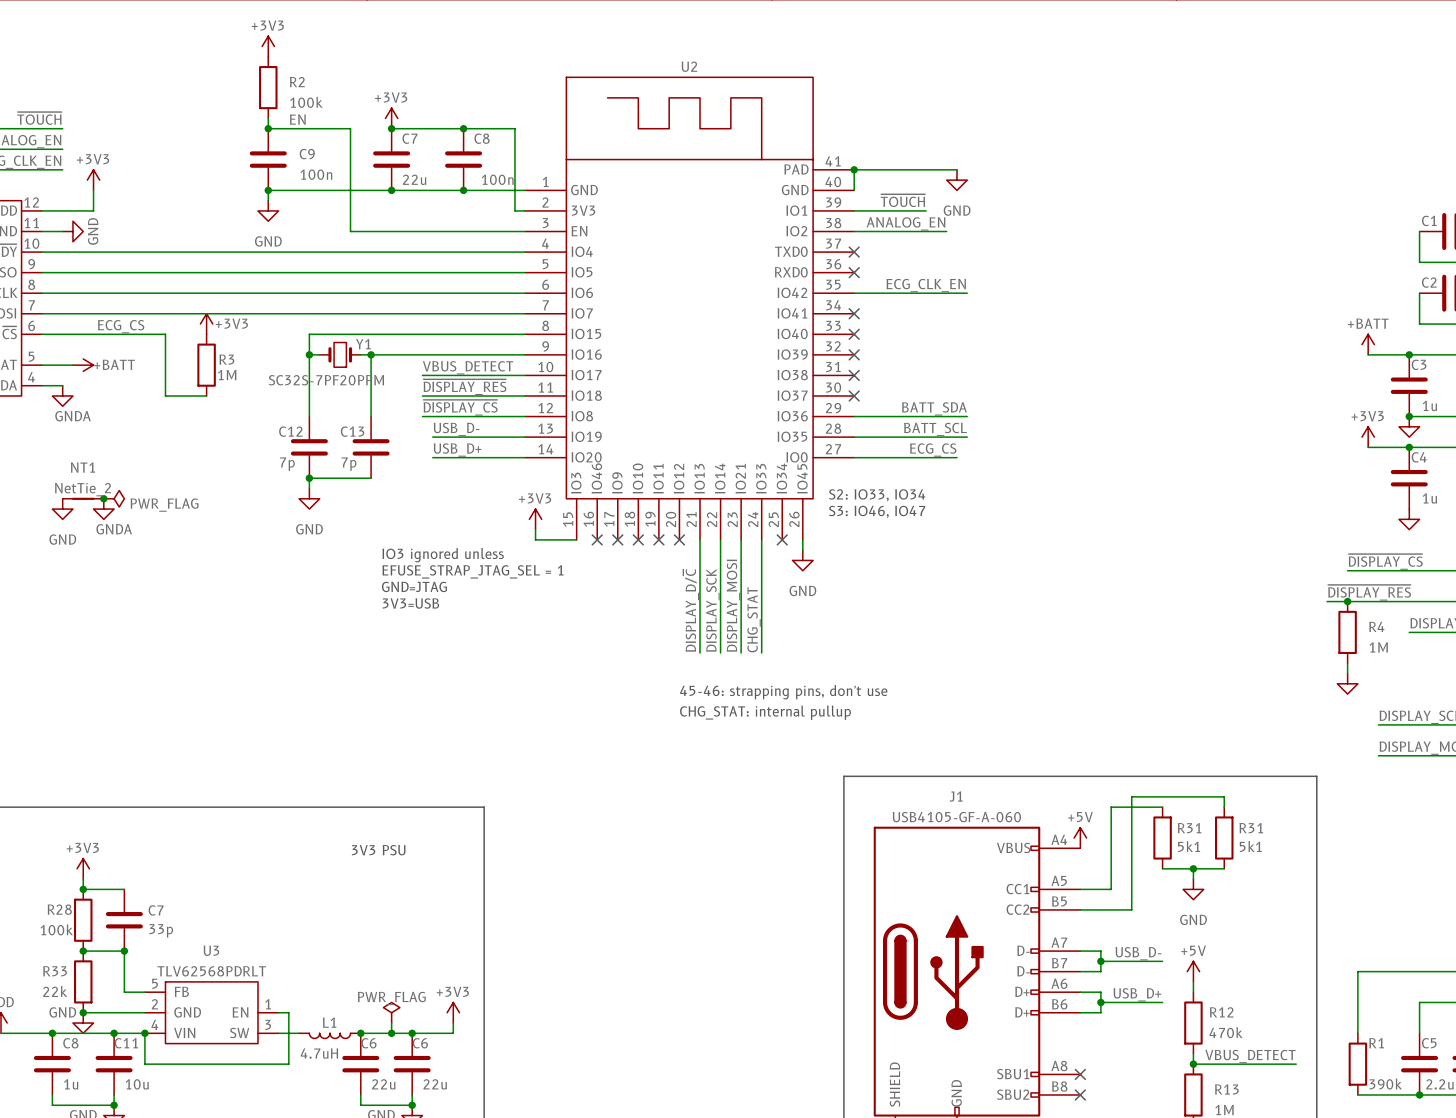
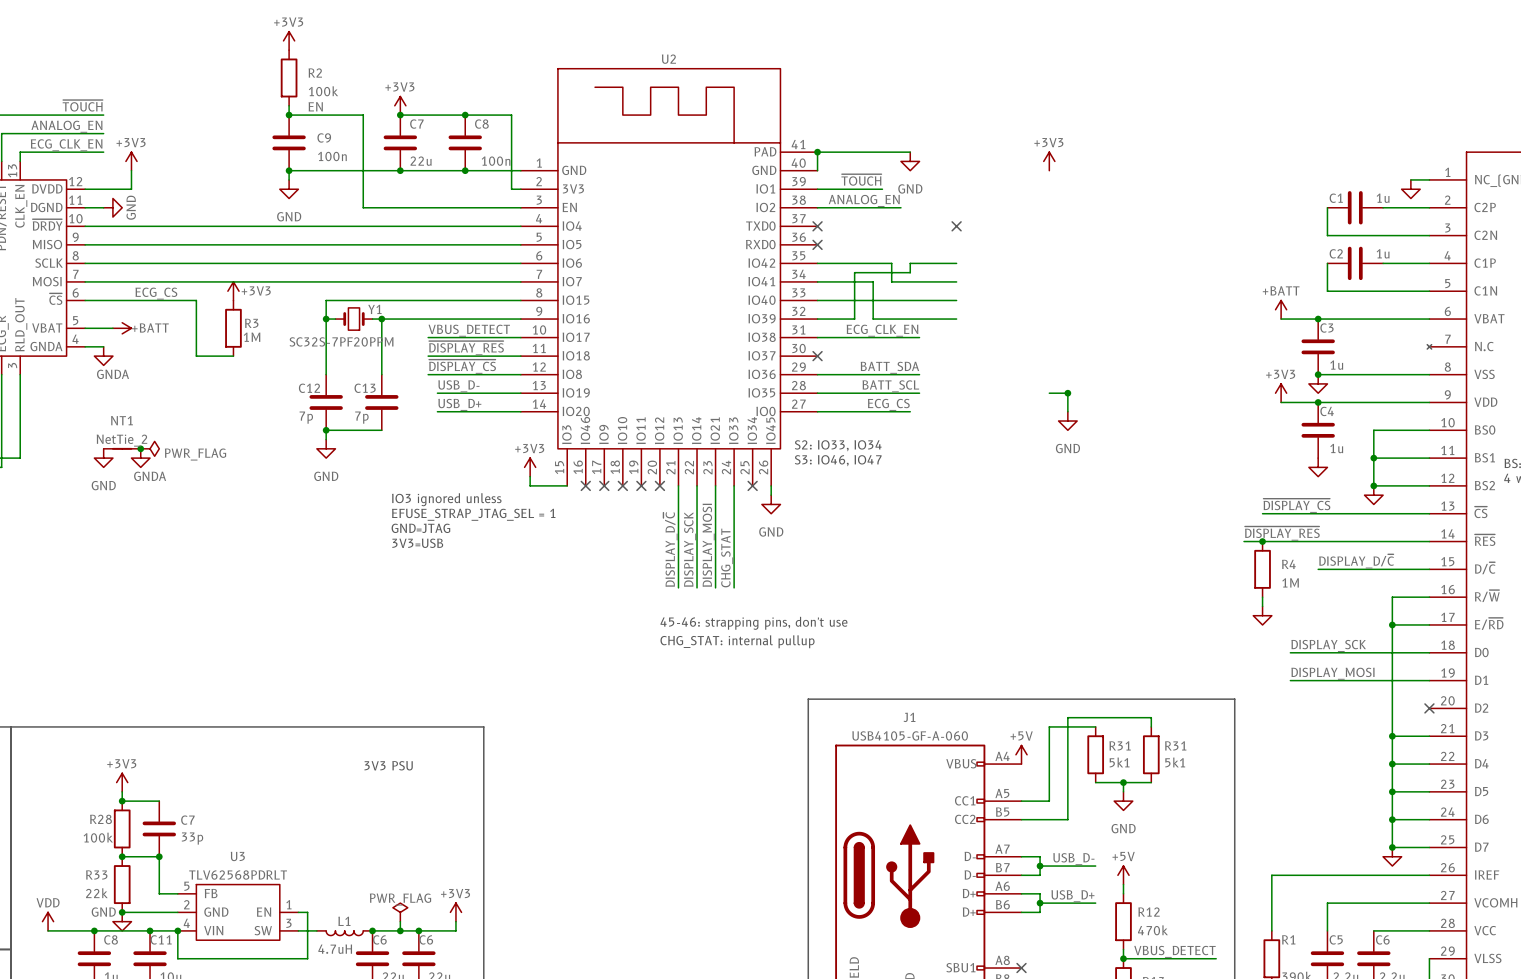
power symbol: none -> +3V3 (1049, 161)
no-connect mark: none -> (956, 226)
label position: ECG_CLK_EN (926, 285) -> ECG_CLK_EN (882, 330)
wire: (936, 293) (956, 293) -> (891, 263) (891, 281) (956, 281)
wire: none -> (910, 263) (910, 272) (854, 272) (854, 319) (817, 319)
wire: none -> (919, 263) (956, 263)
wire: none -> (817, 281) (873, 281) (873, 319) (956, 319)
no-connect mark: (854, 313) -> none
wire: none -> (817, 300) (956, 300)
no-connect mark: (854, 334) -> none
no-connect mark: (854, 354) -> none
wire: none -> (817, 337) (919, 337)
no-connect mark: (854, 375) -> none
wire: none -> (1049, 393) (1067, 393) (1067, 411)
junction: none -> (1067, 393)
power symbol: none -> GND (1067, 421)

